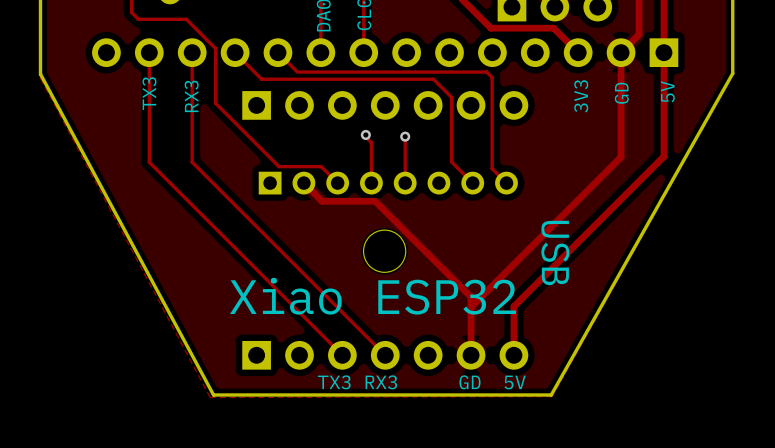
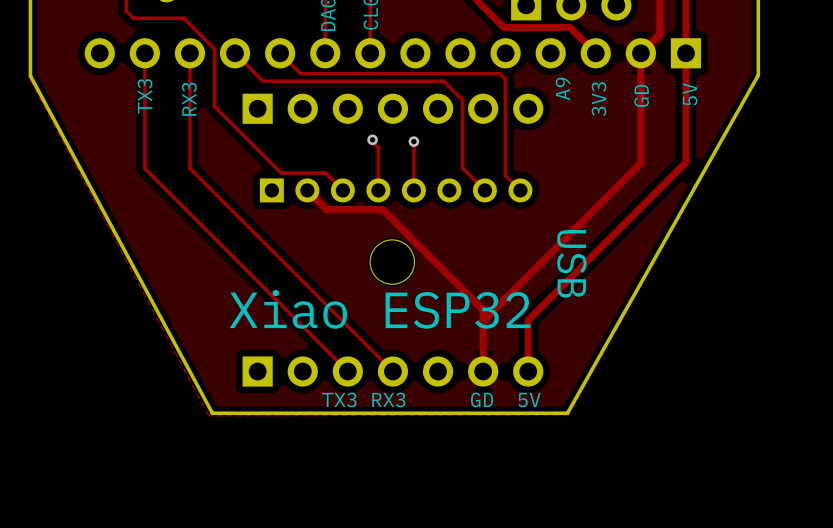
text: none -> A9 (562, 88)

